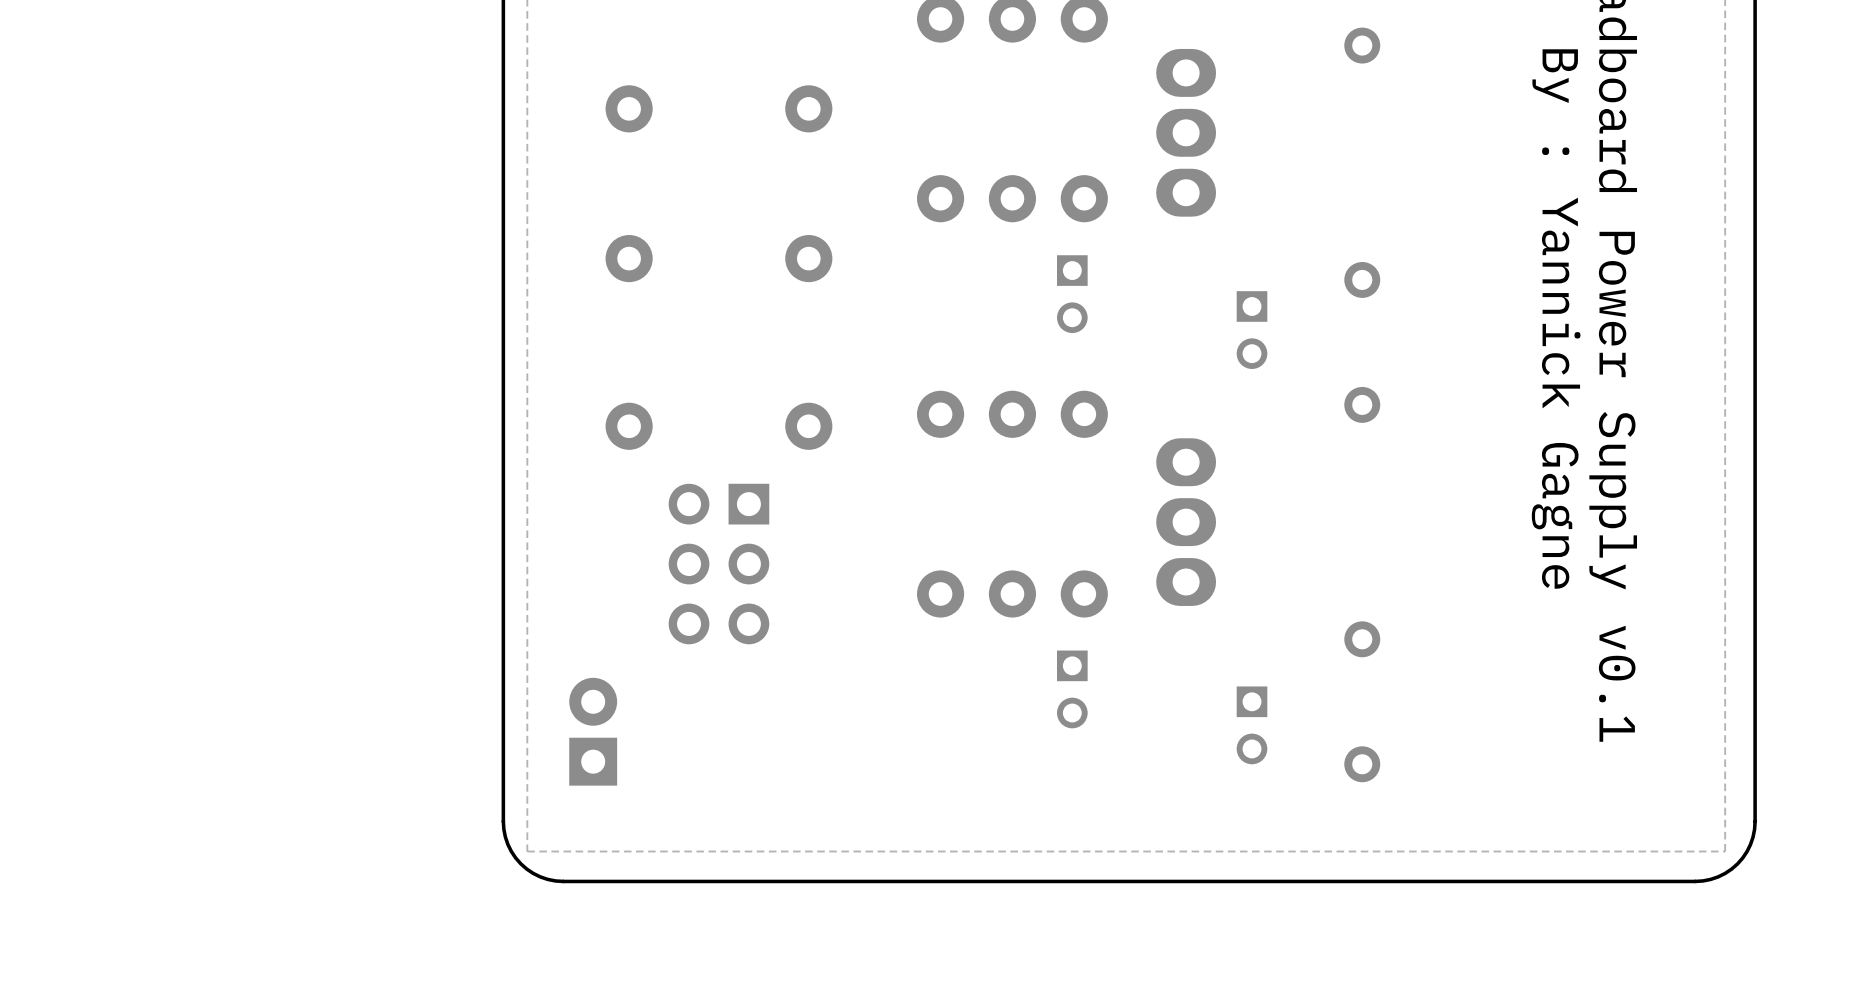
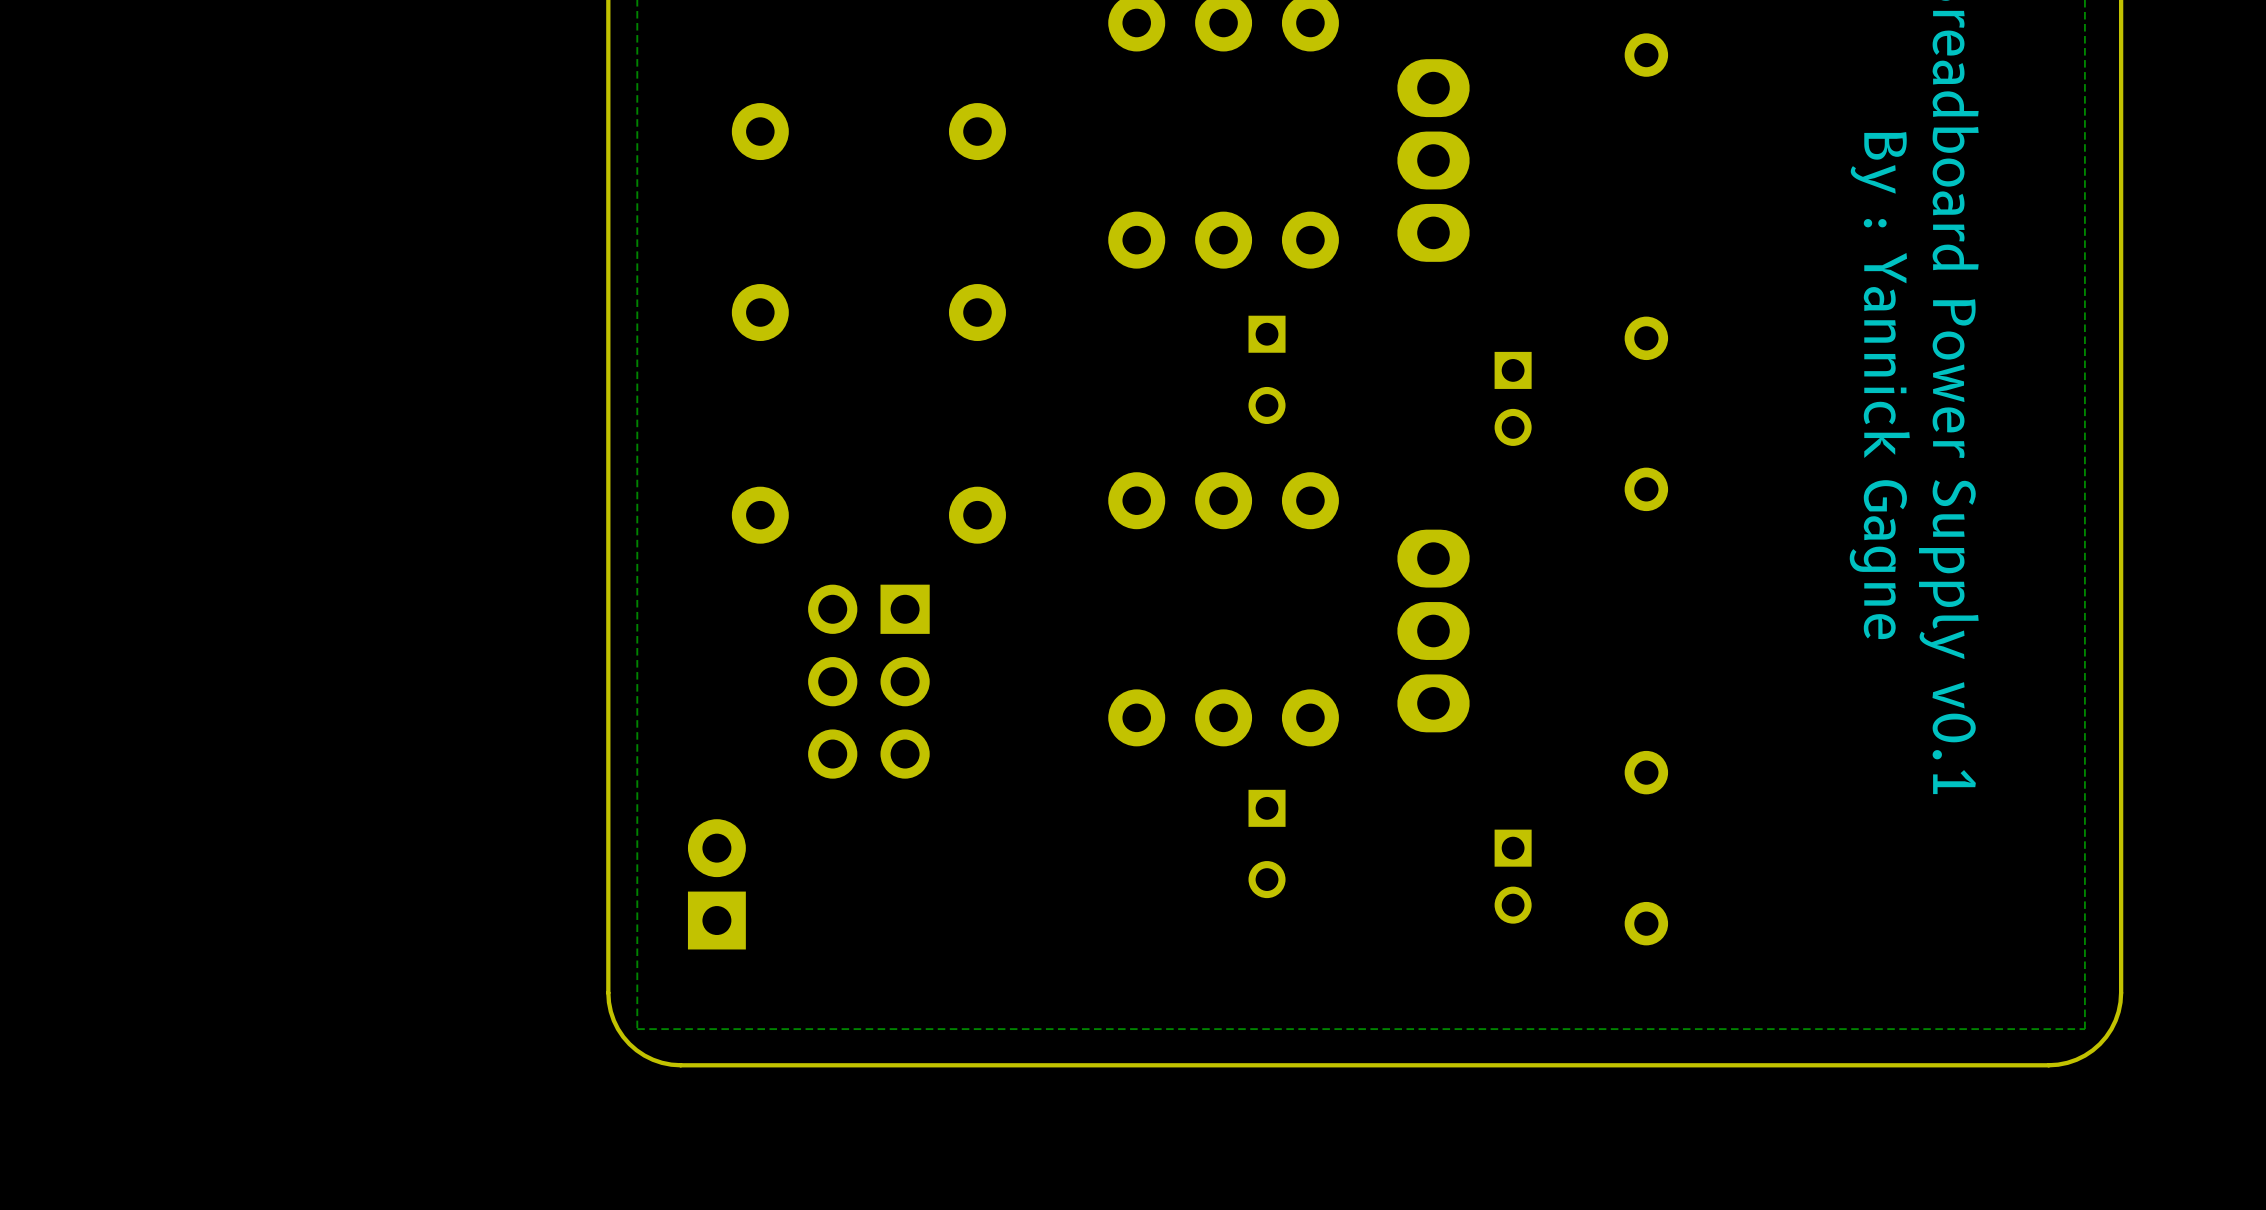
part: (1072, 294) -> none
part: none -> (1267, 369)
part: (1072, 689) -> none
part: none -> (1267, 843)

